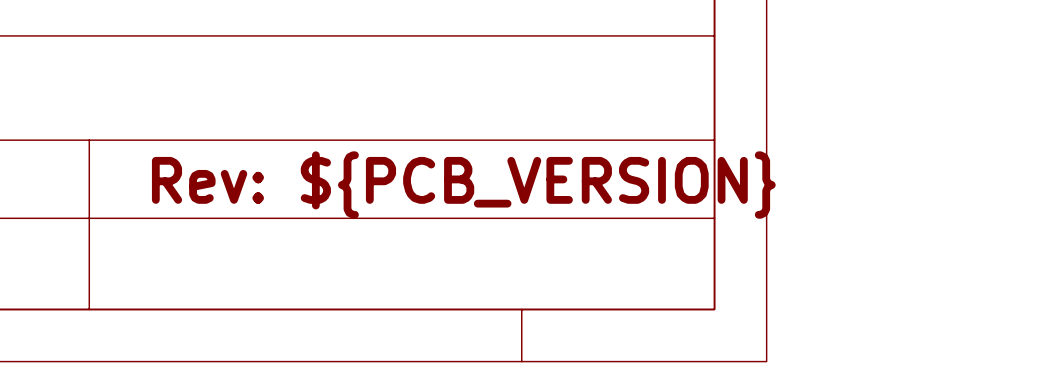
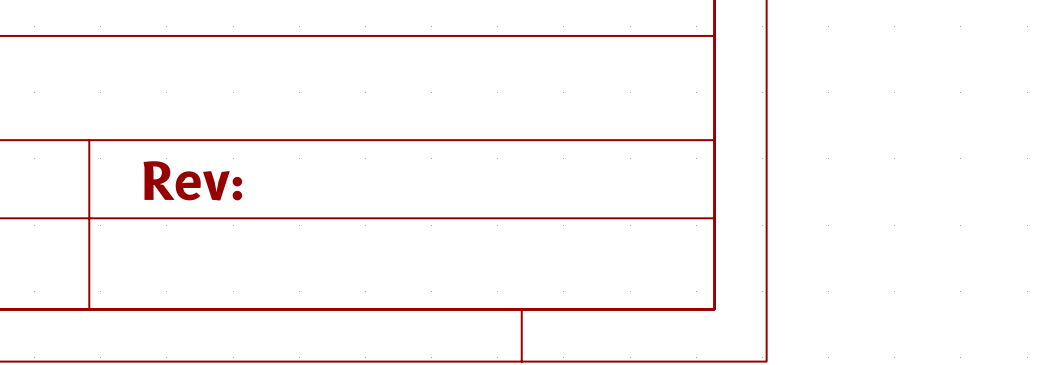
title block: Rev: ${PCB_VERSION} (463, 185) -> Rev: (192, 180)

